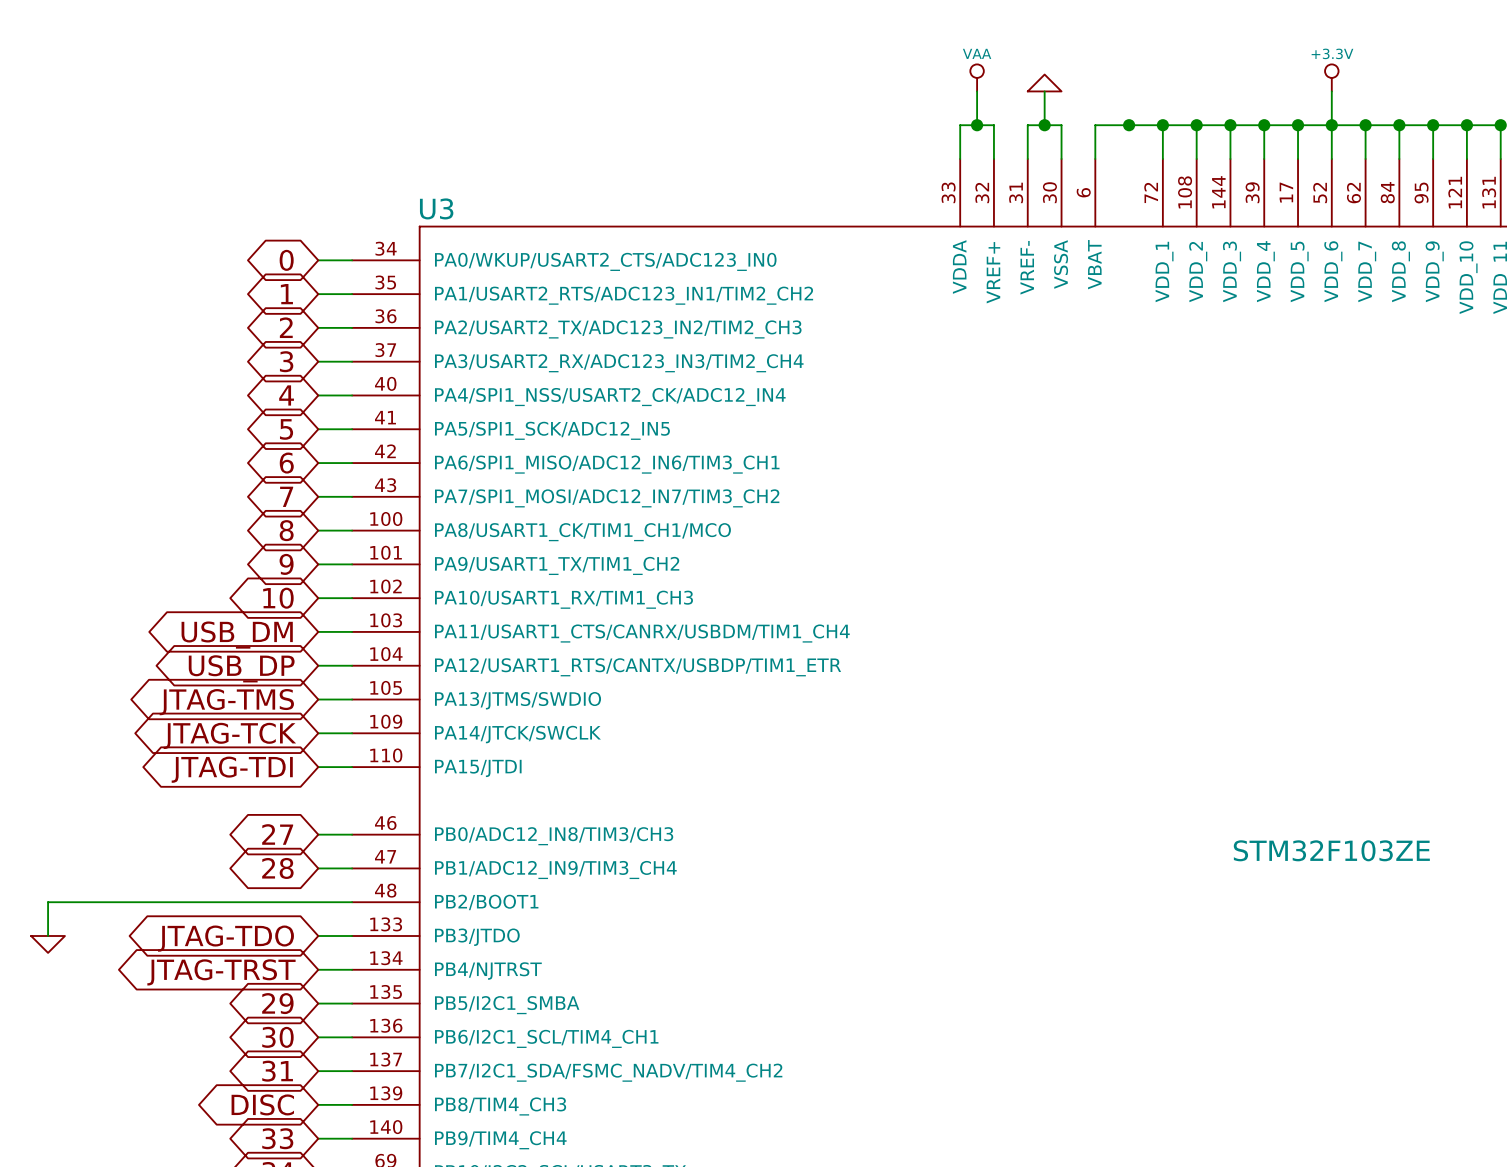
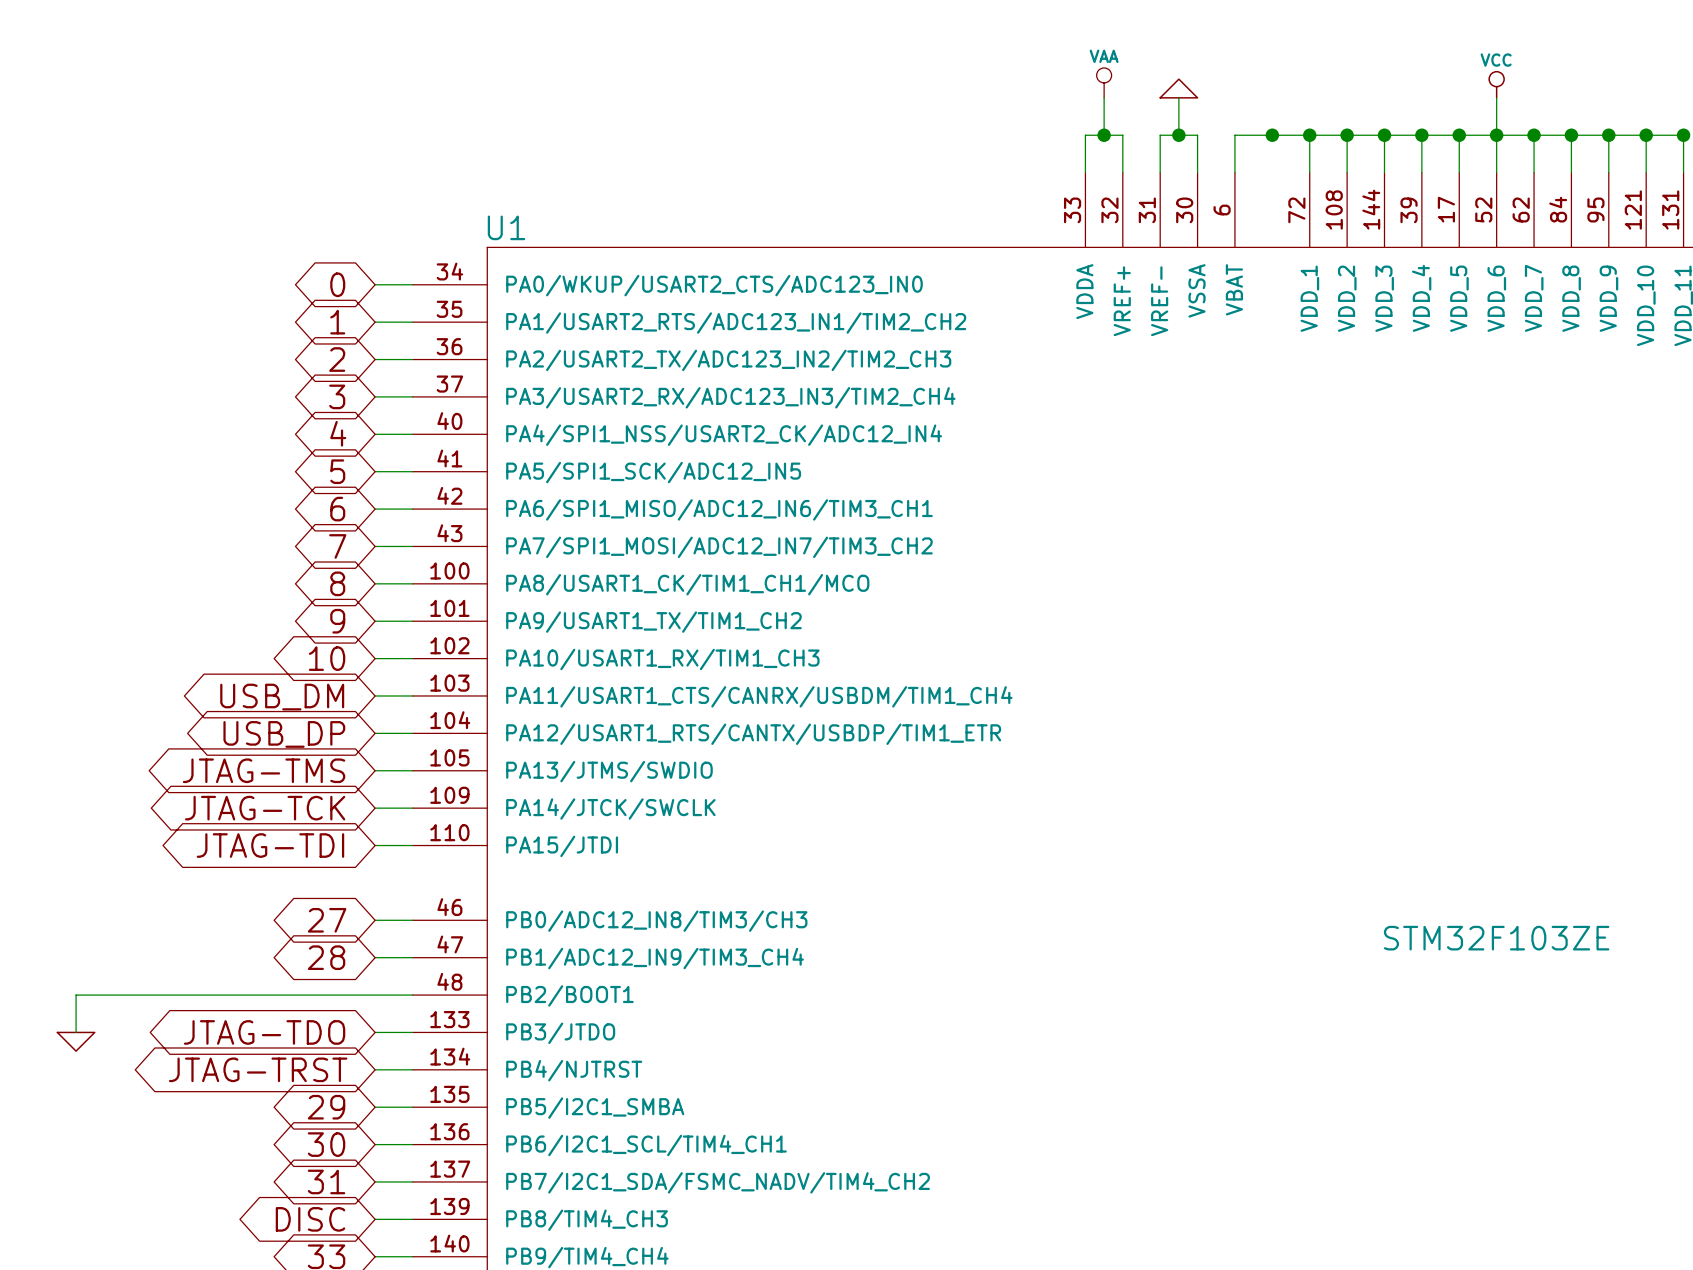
power symbol: +3.3V (1331, 77) -> VCC (1496, 84)
U3 name: U3 (436, 208) -> U1 (506, 227)

